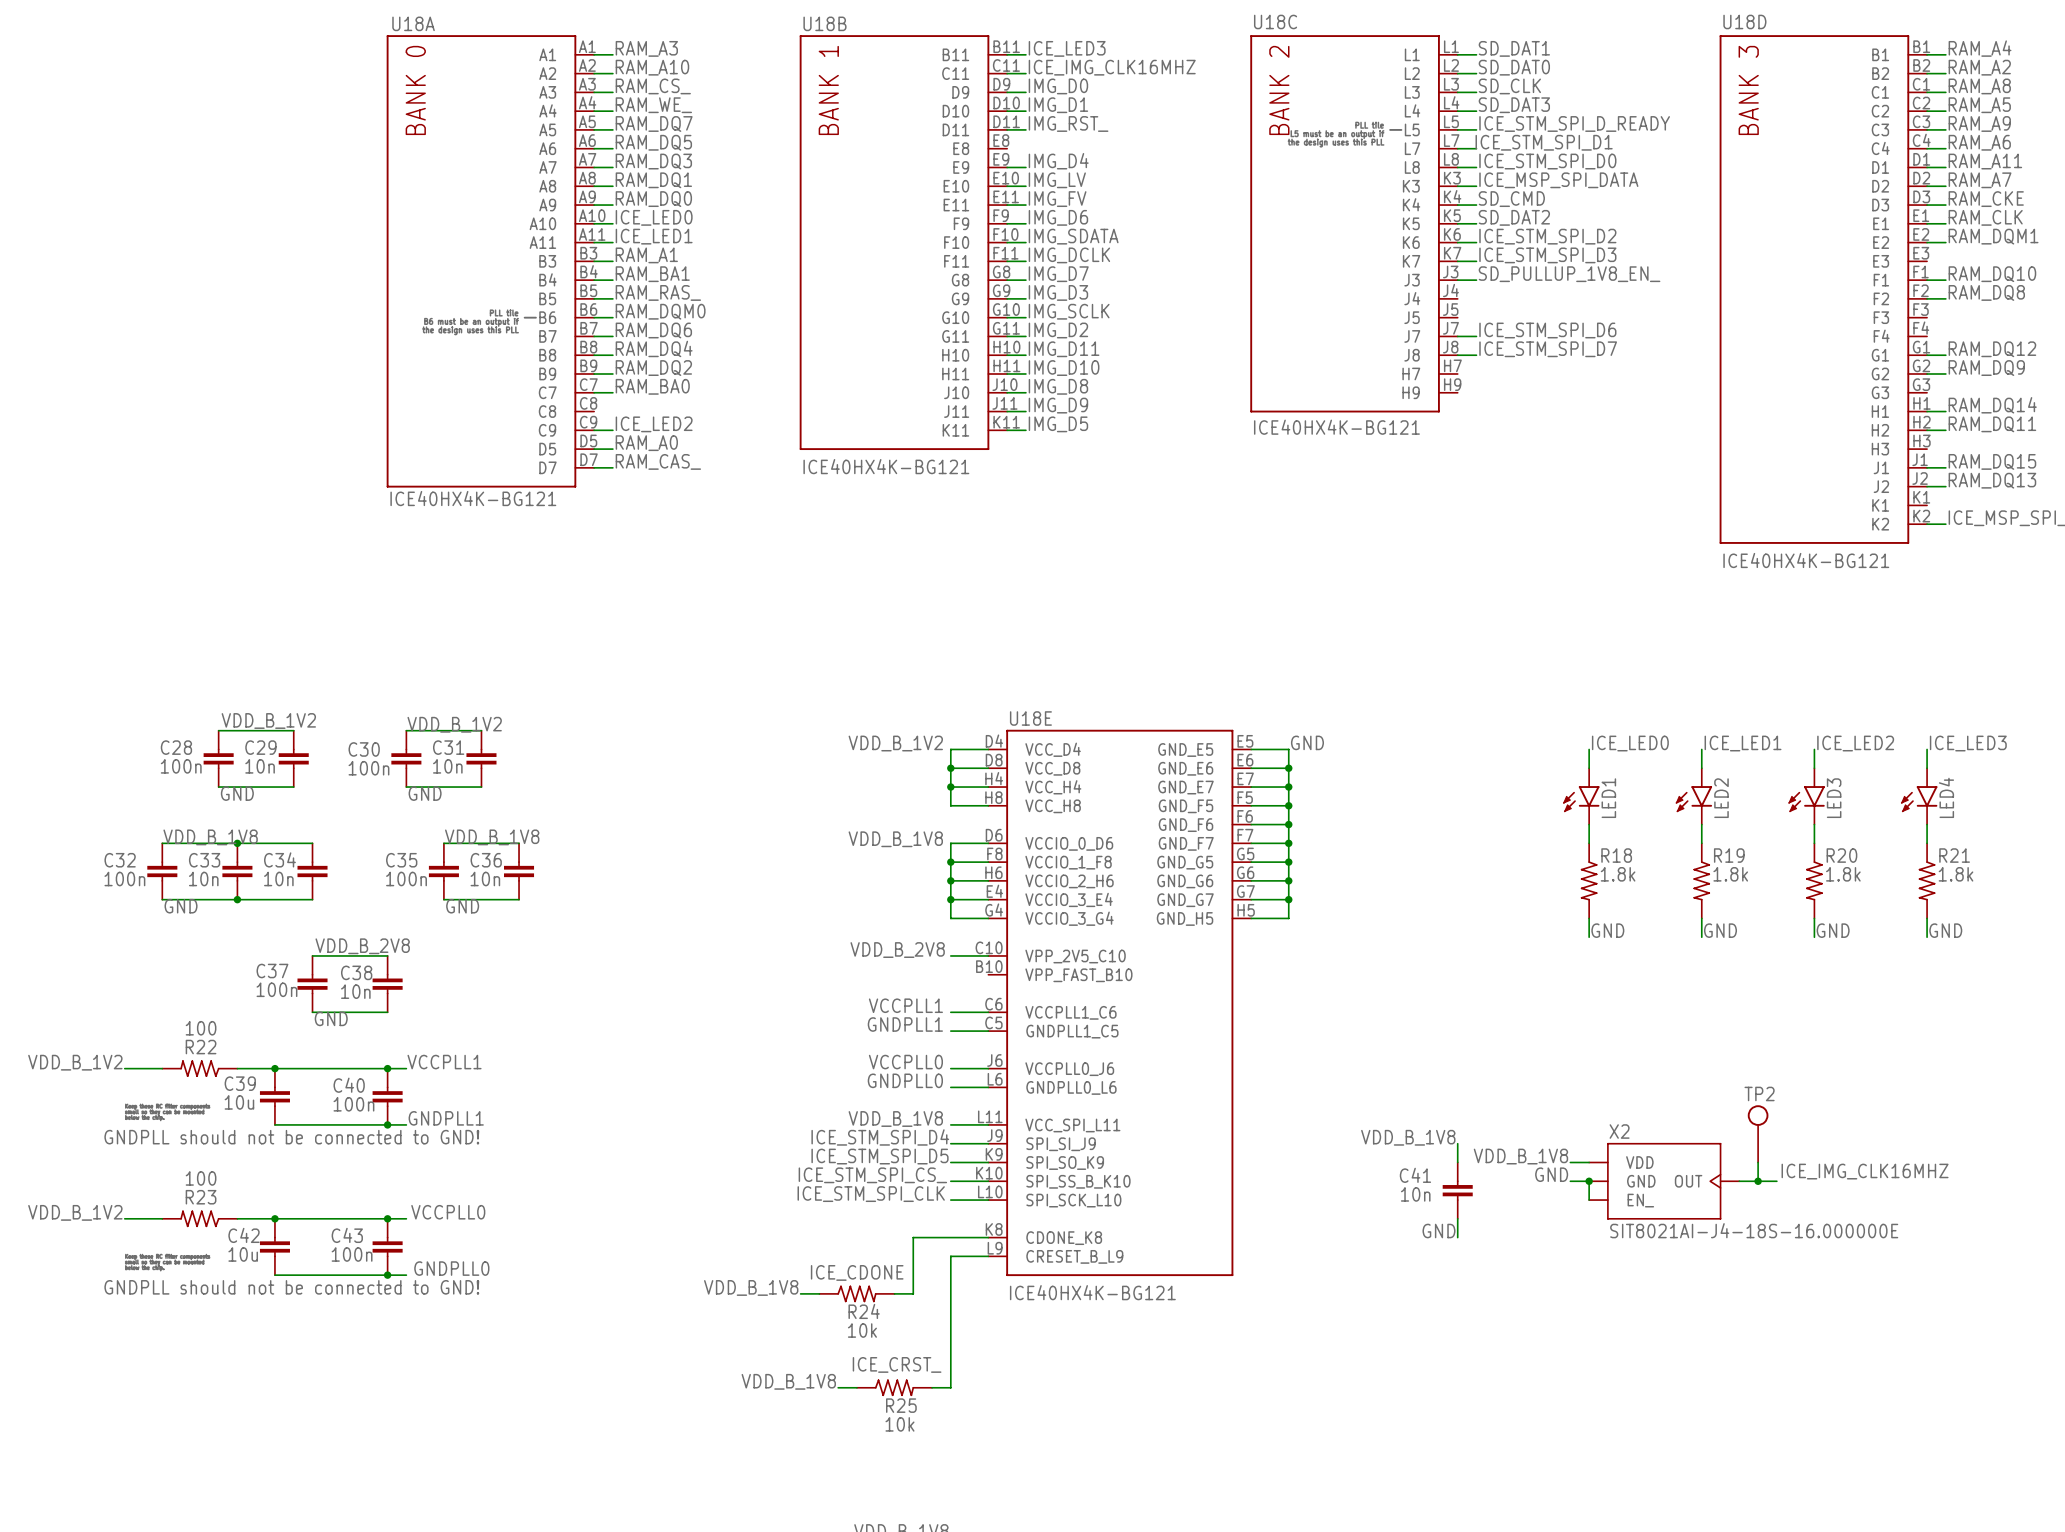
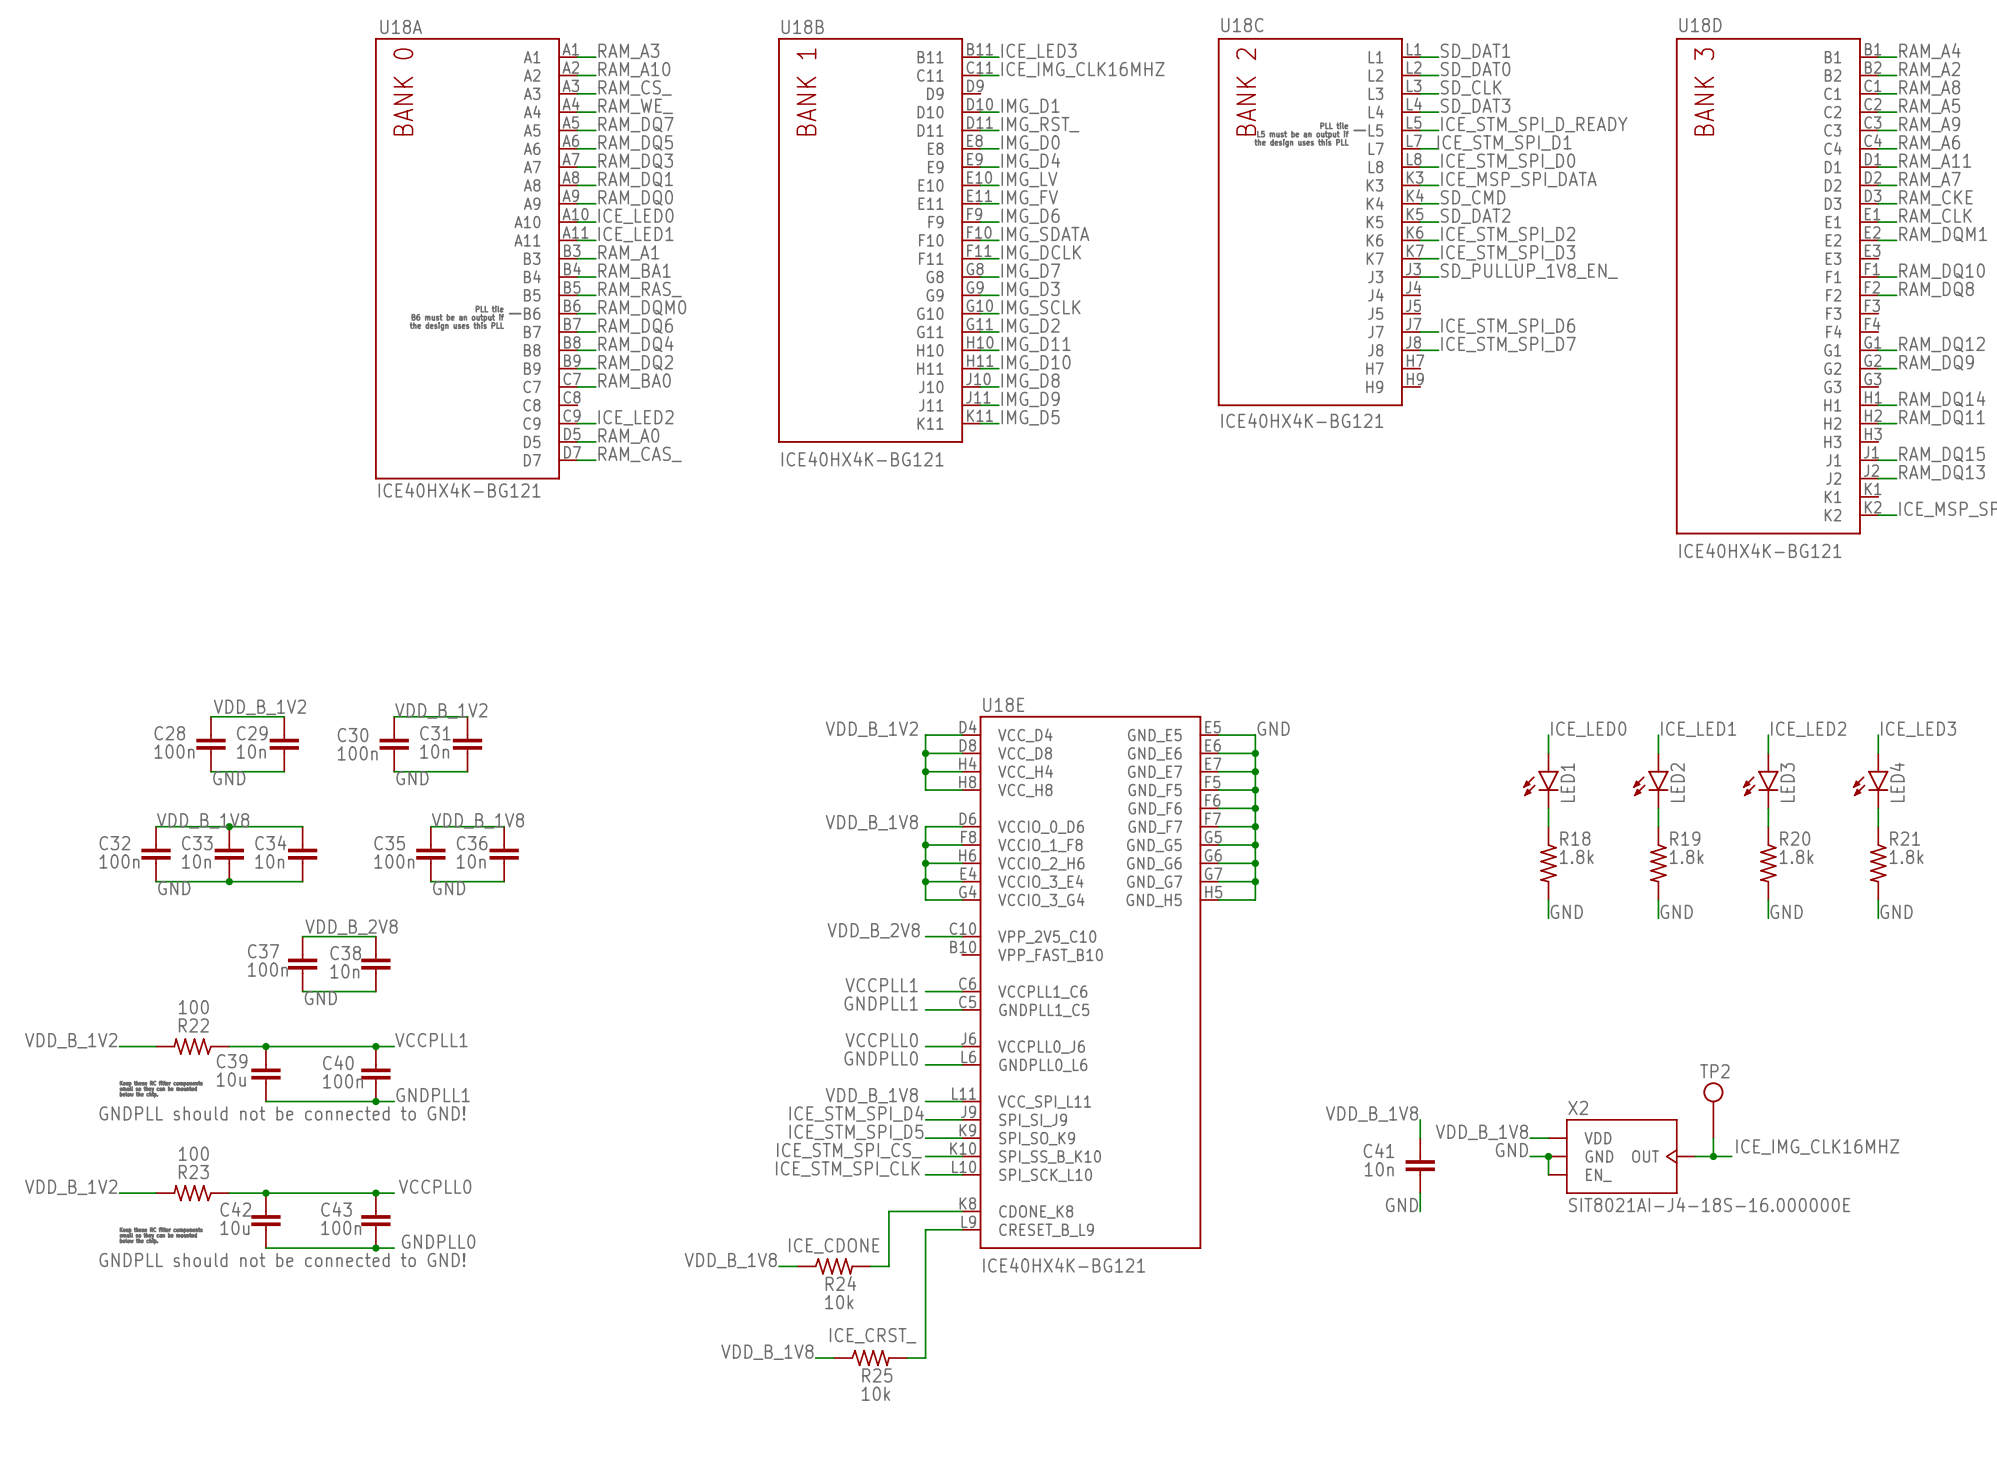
label position: IMG_D0 (1058, 86) -> IMG_D0 (1030, 142)
wire: (1007, 92) (1025, 92) -> (980, 148) (998, 148)

